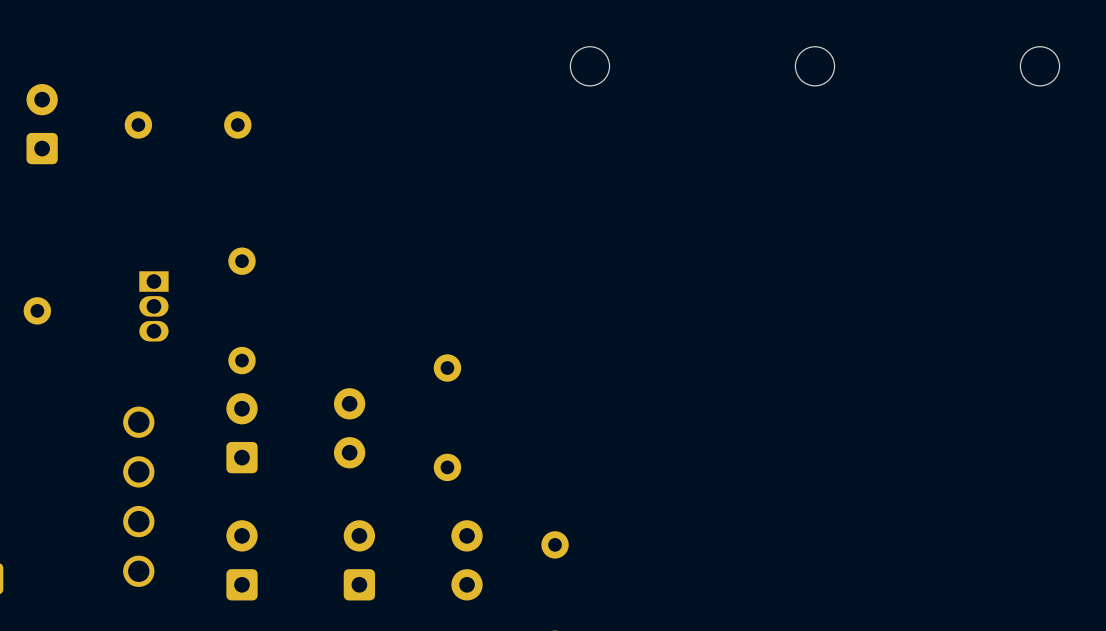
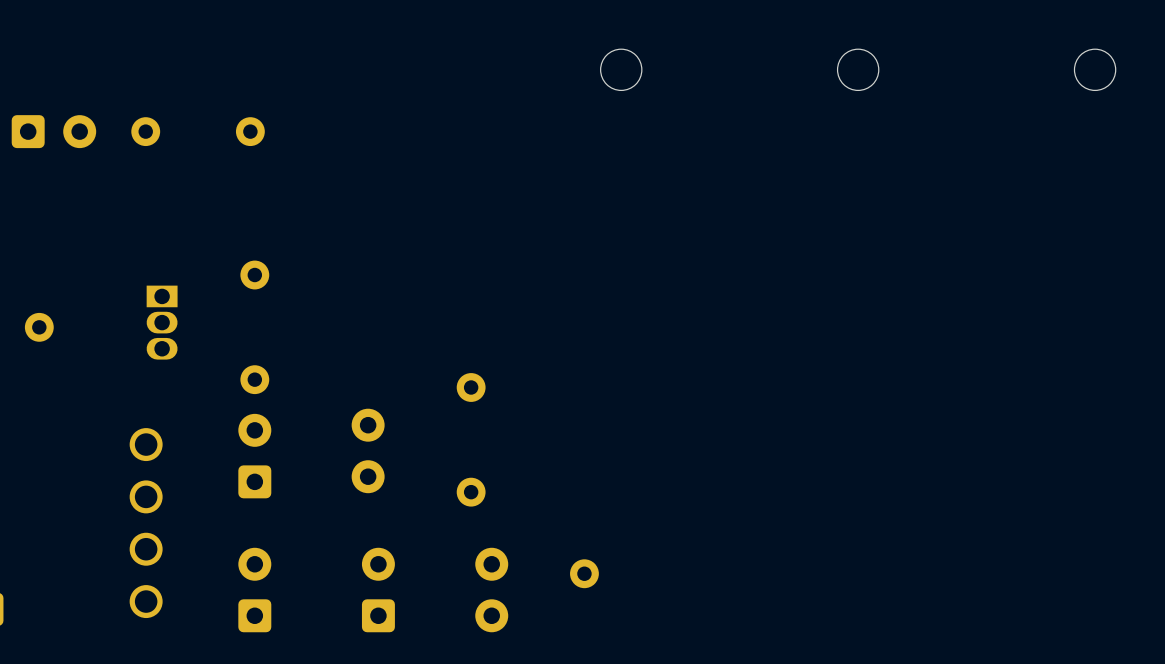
part rotation: 0° (42, 124) -> 90° clockwise (53, 131)

